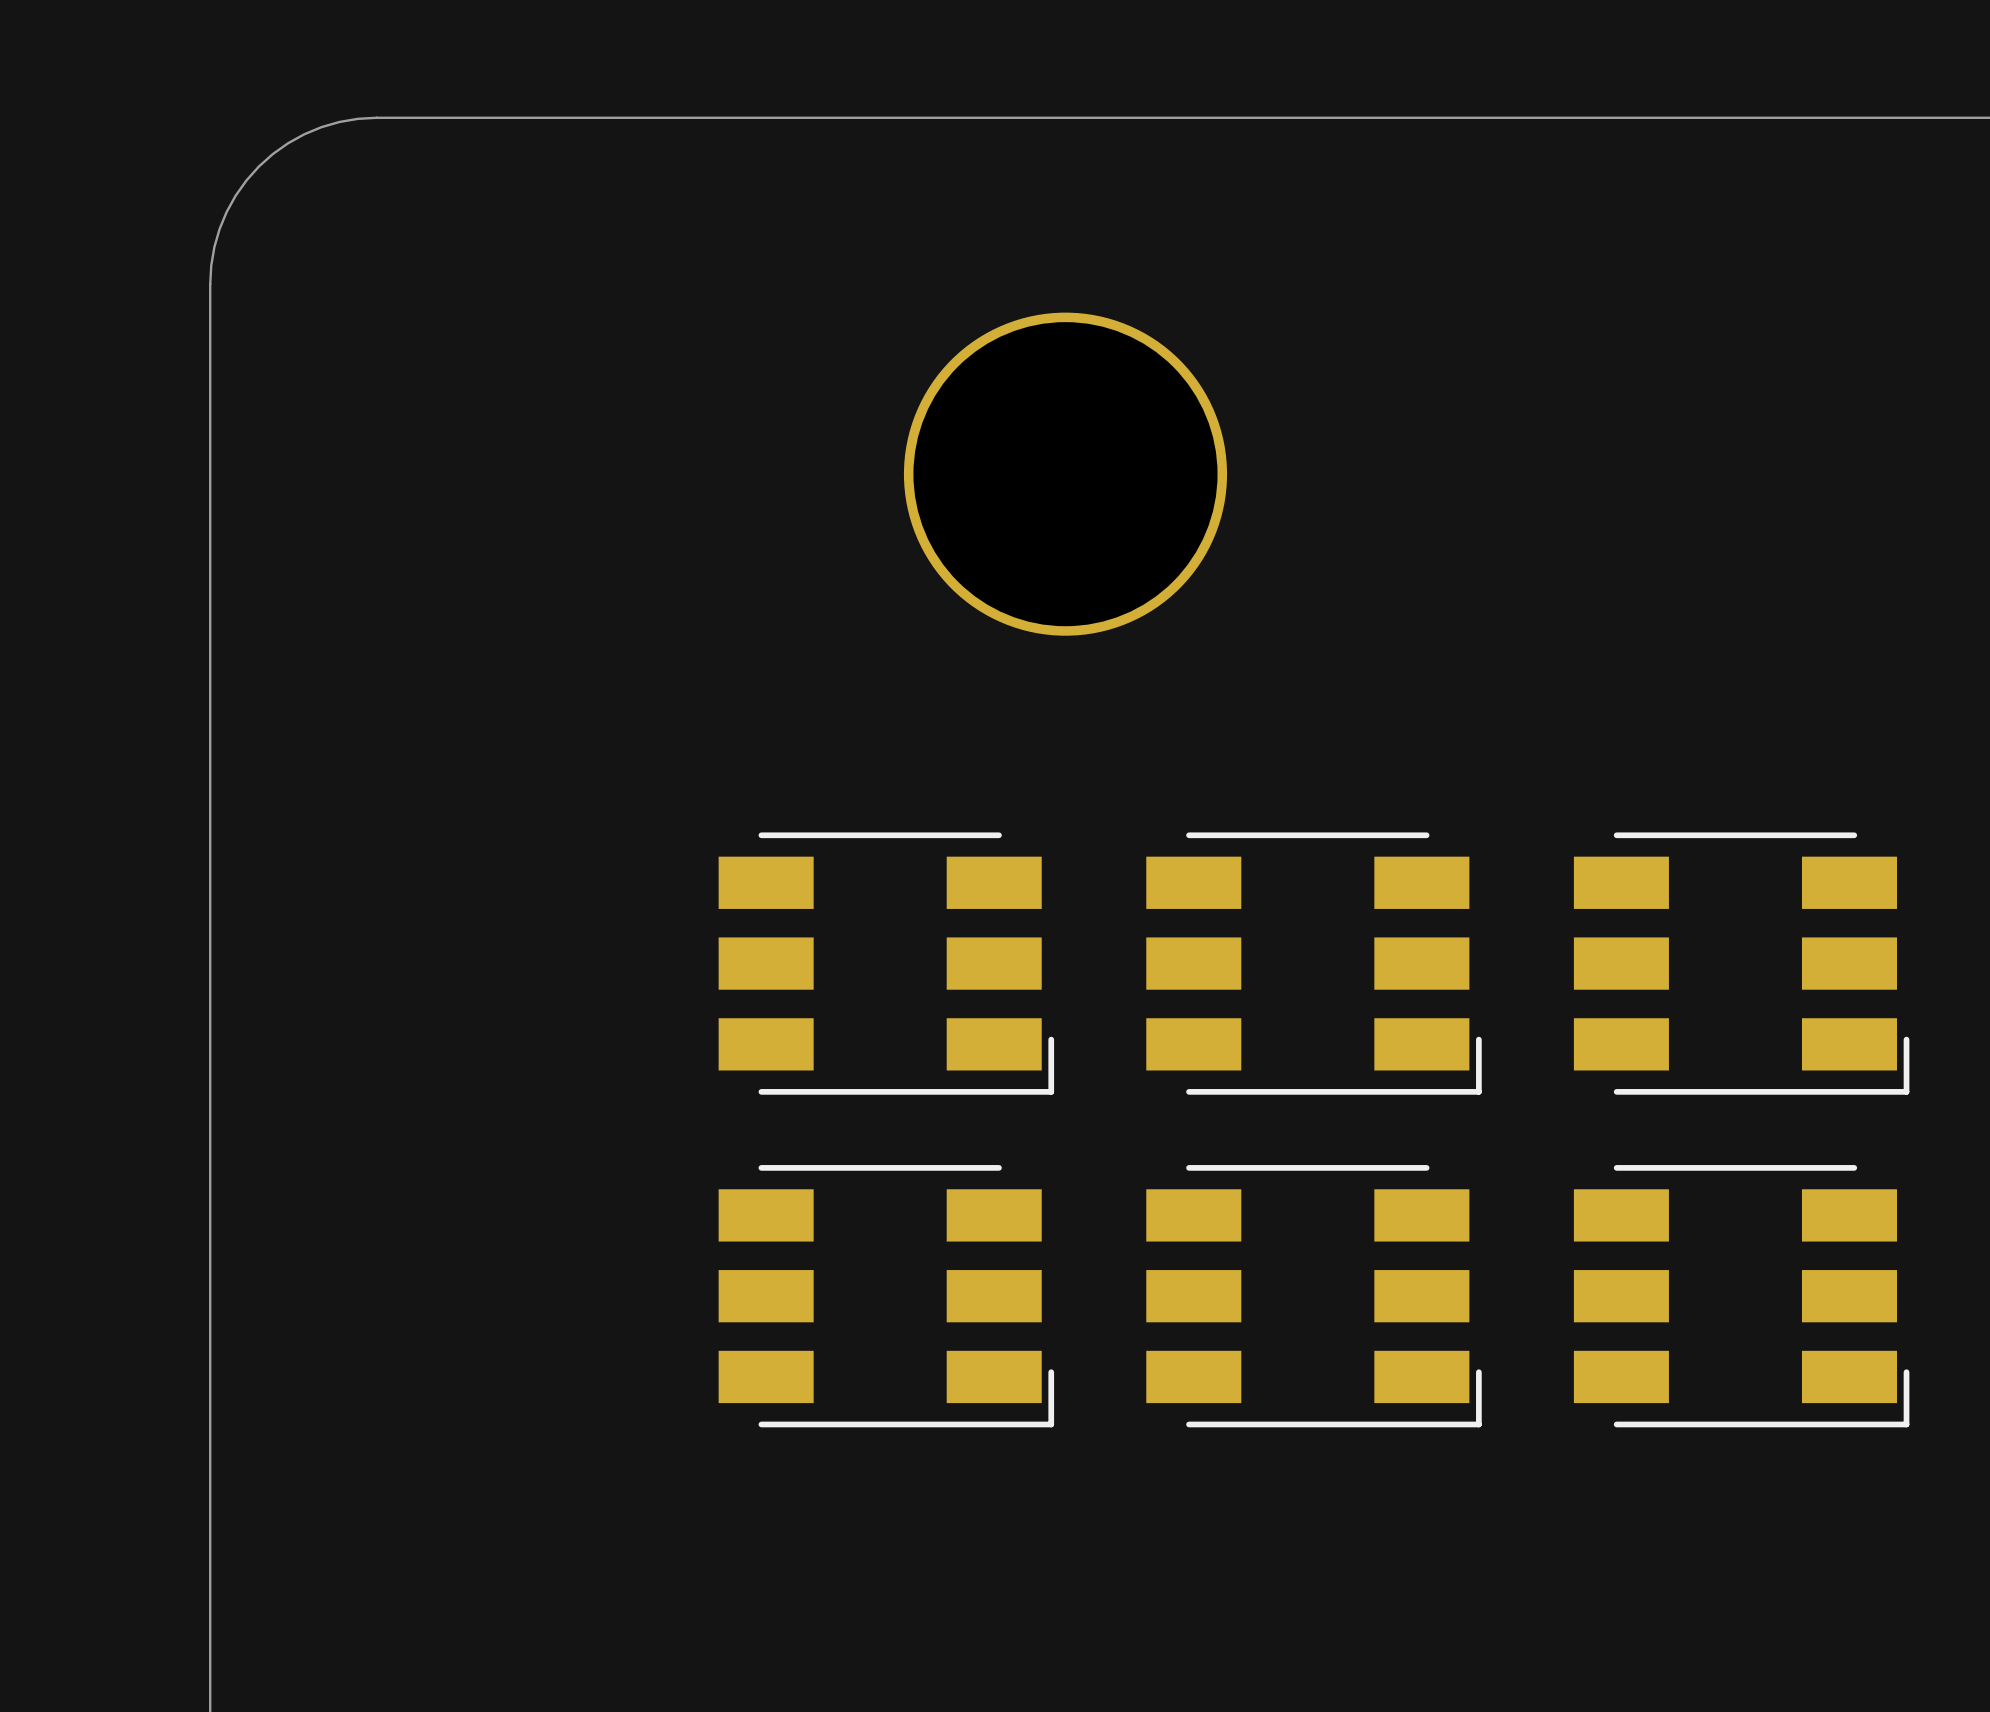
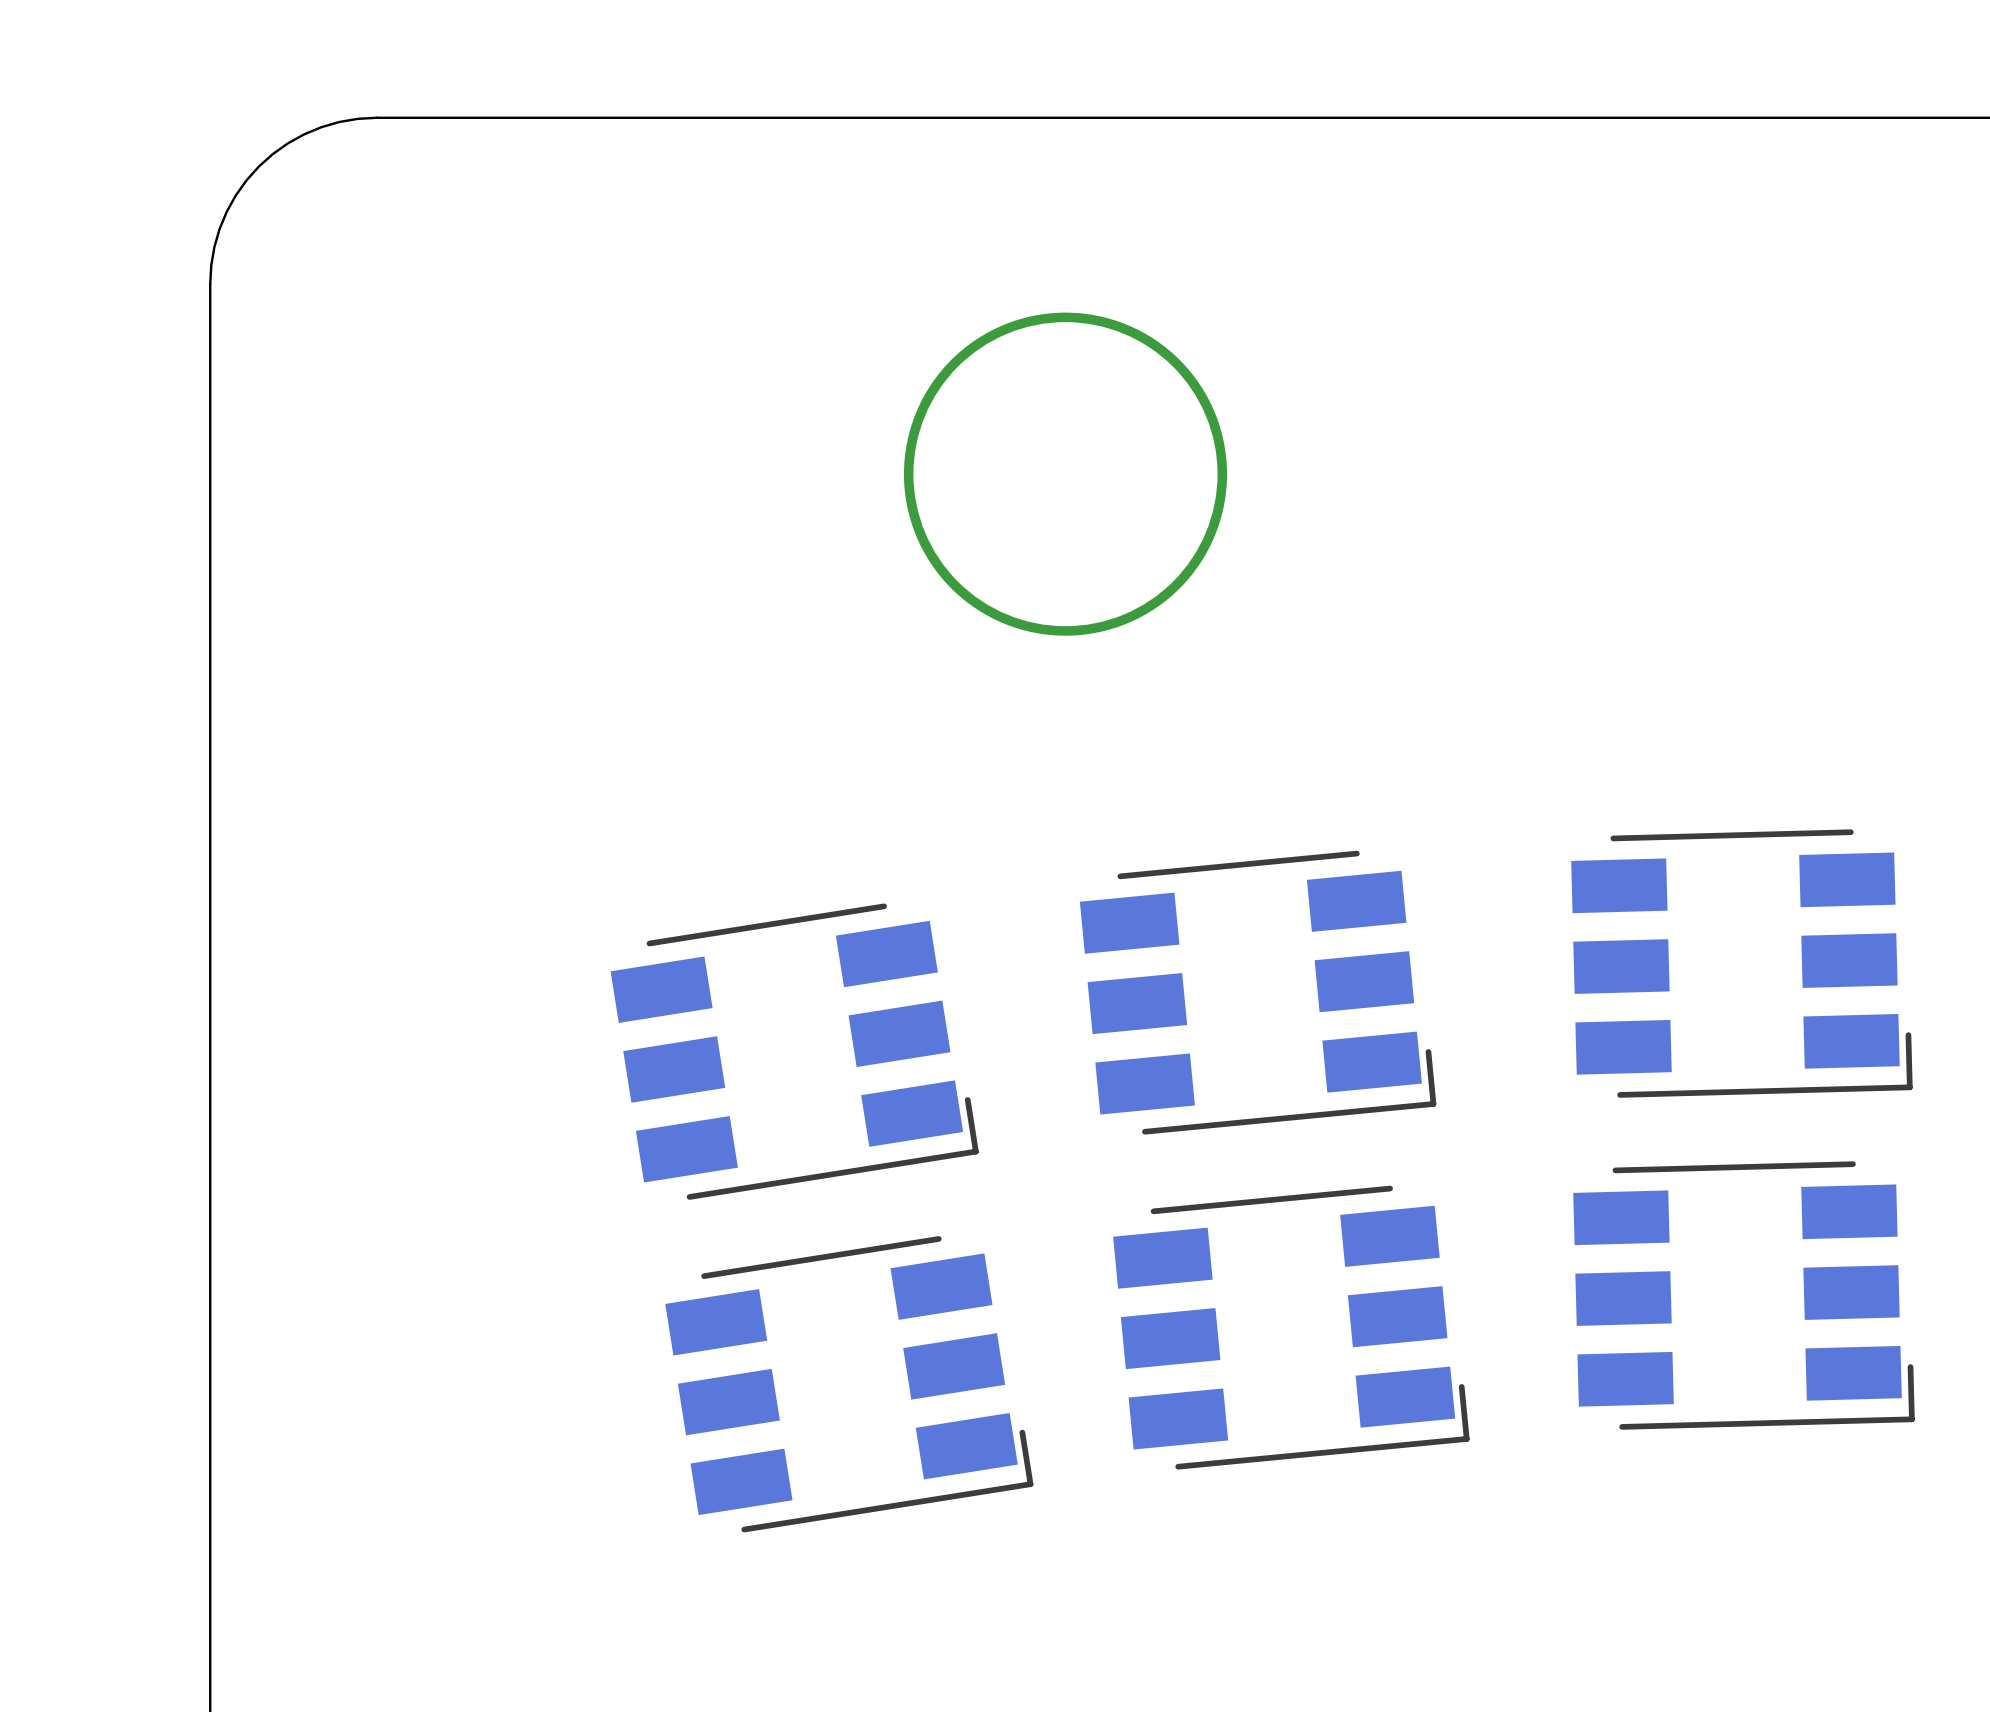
part: (886, 963) -> none
part: (1314, 963) -> none
part rotation: 0° (1741, 963) -> 1.5° counterclockwise (1741, 963)
part: none -> (1258, 992)
part: none -> (794, 1051)
part: (886, 1296) -> none
part rotation: 0° (1314, 1296) -> 5.5° counterclockwise (1291, 1327)
part rotation: 0° (1741, 1296) -> 1.5° counterclockwise (1743, 1295)
part: none -> (849, 1384)

